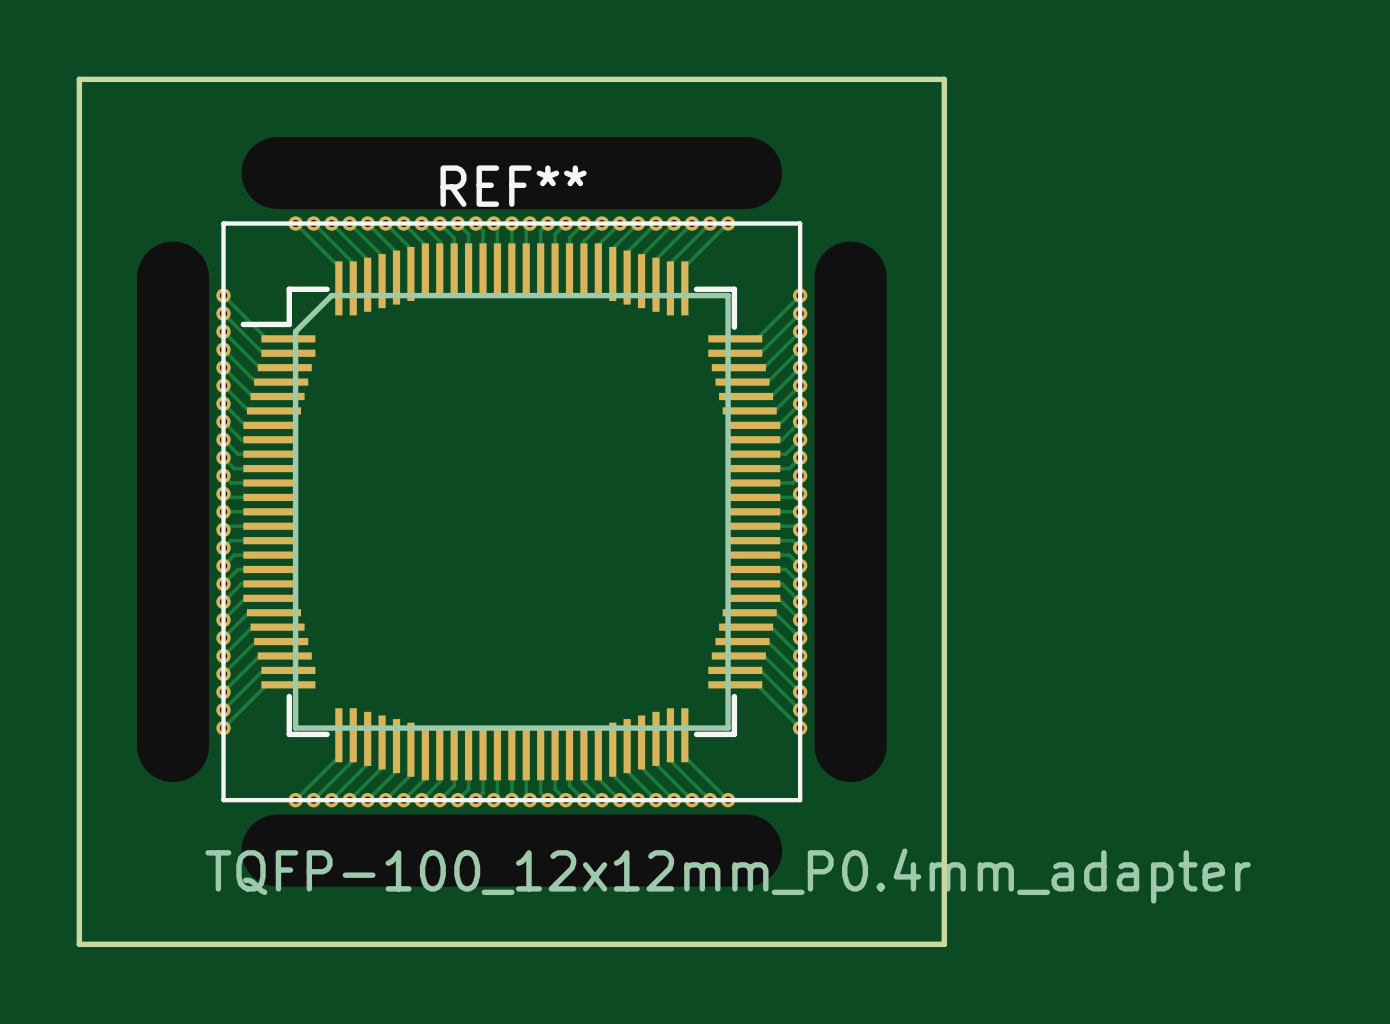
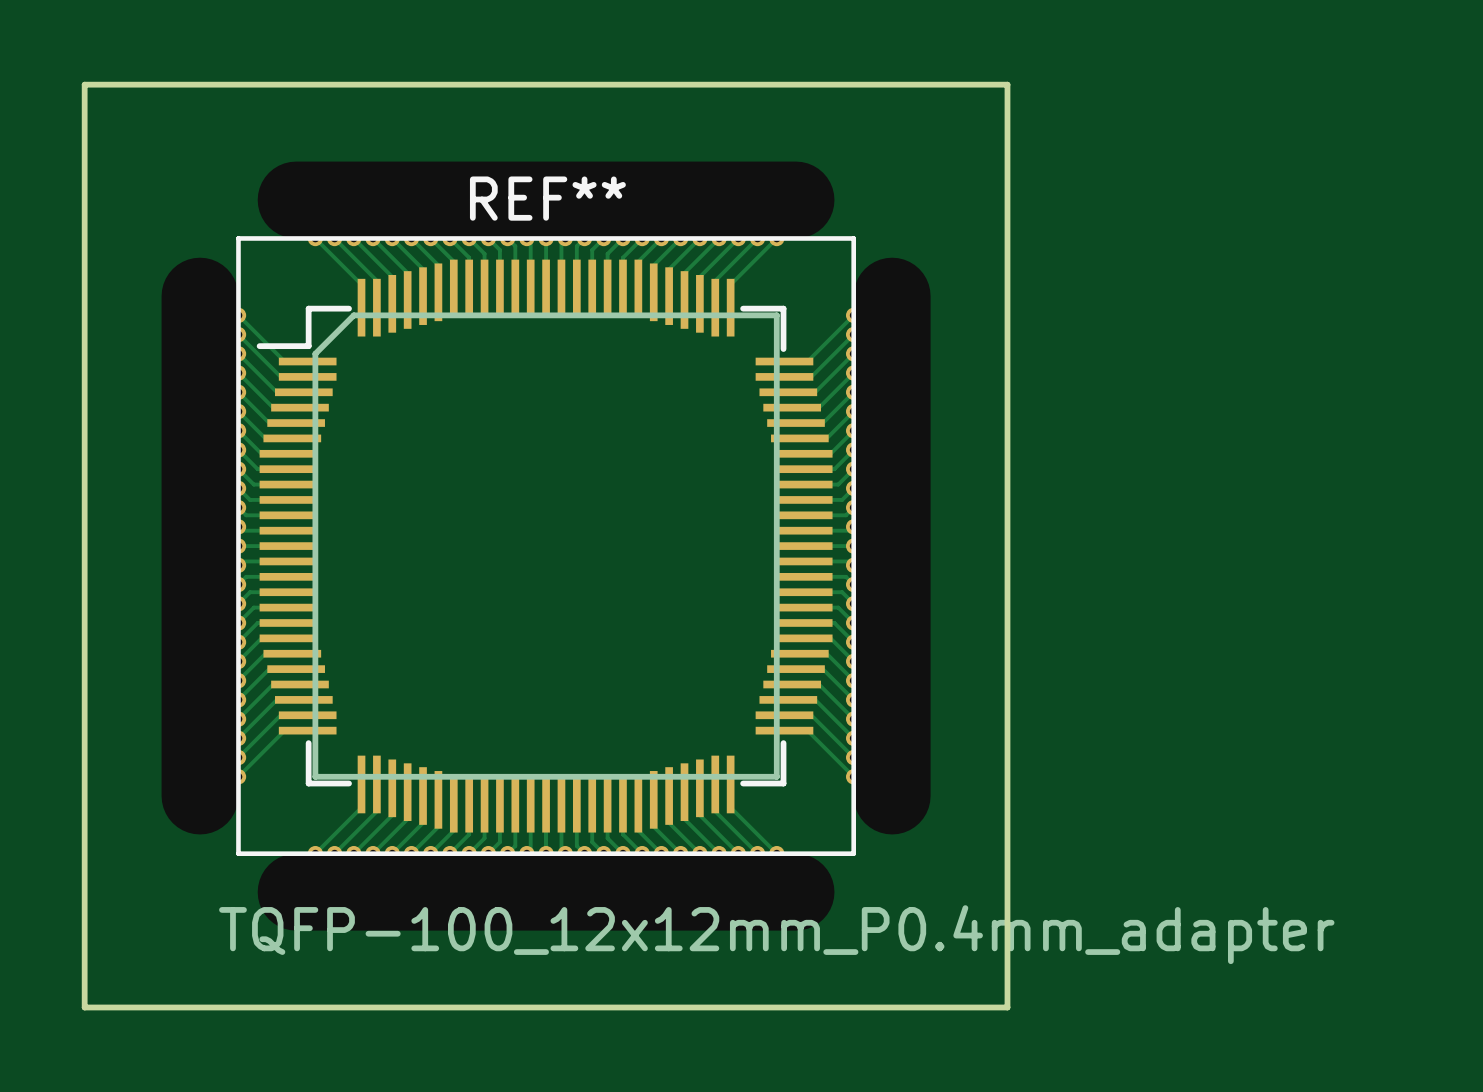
REF** footprint: [137, 137, 887, 887] -> [161, 161, 931, 931]

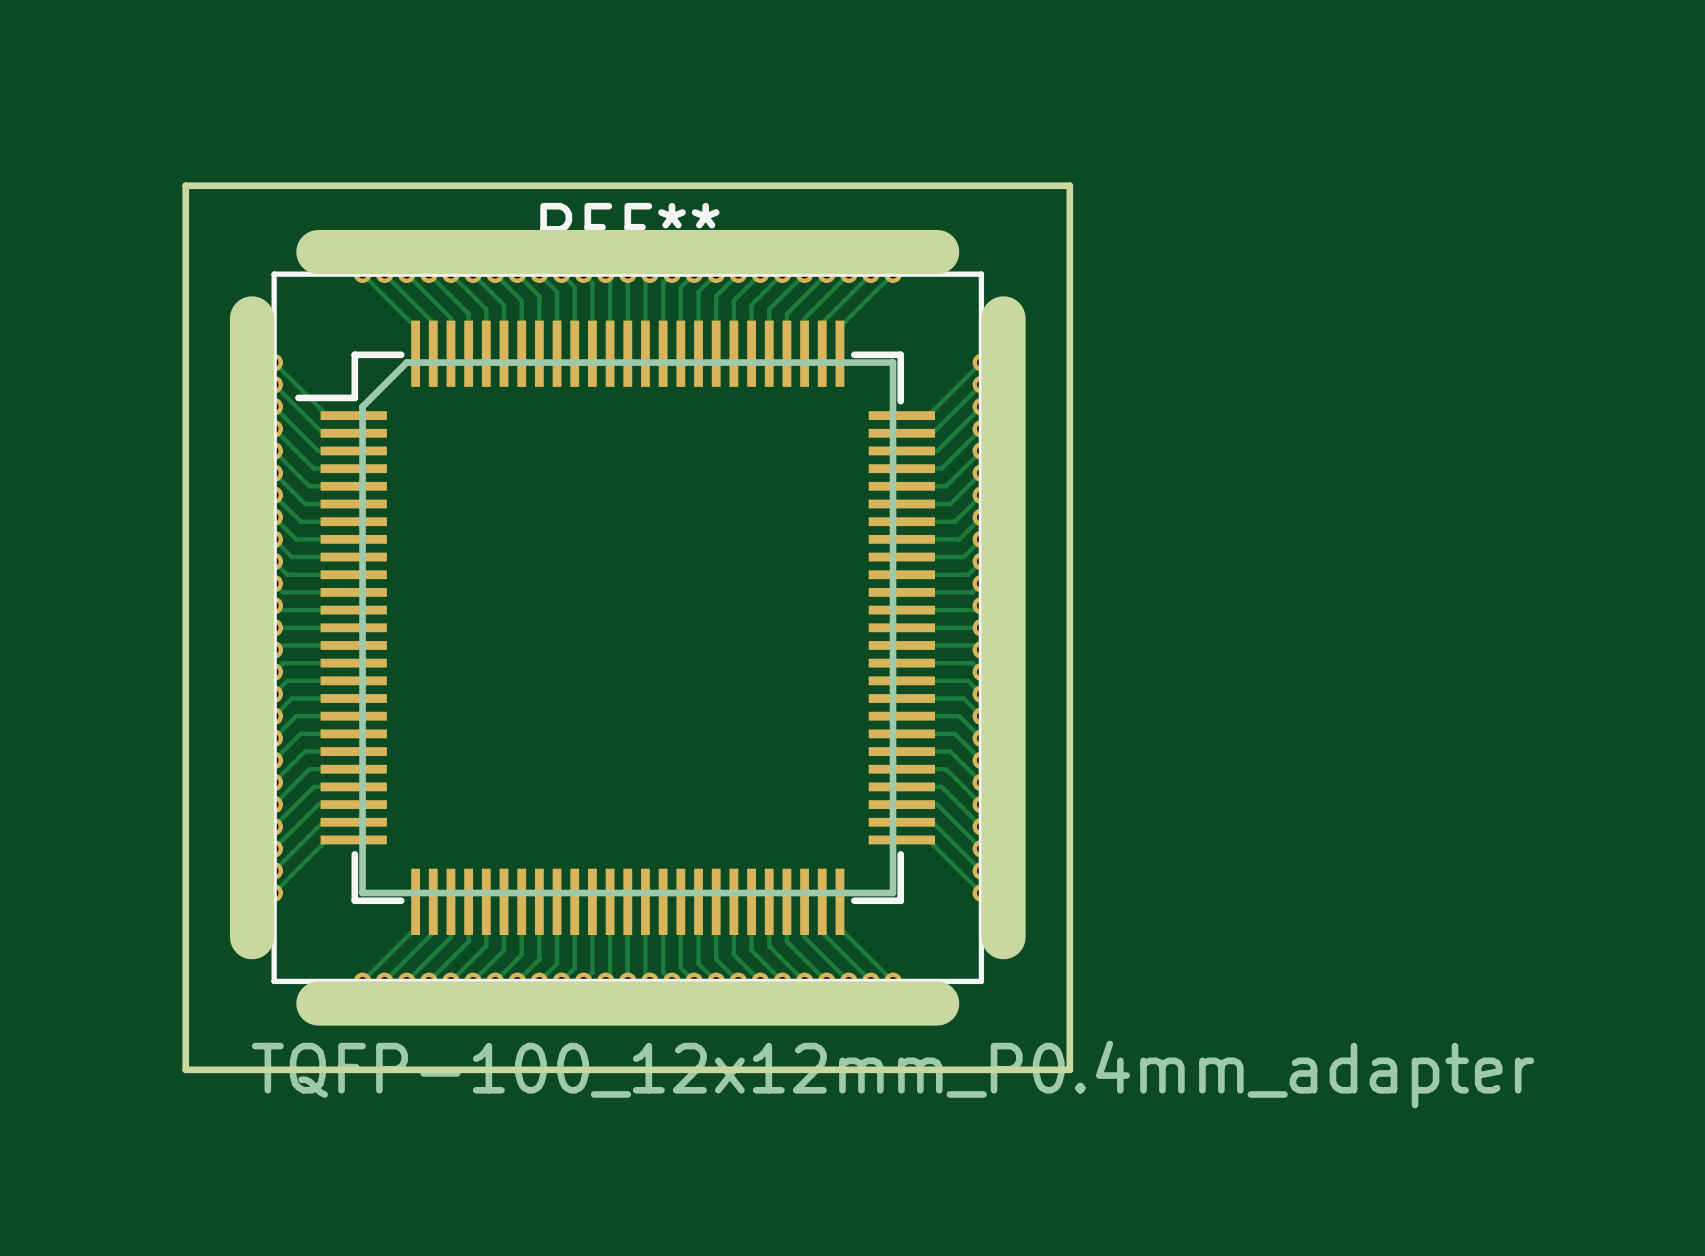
board edge: (84, 84) (84, 1007) (1007, 1007) (1007, 84) (84, 84) -> (185, 185) (185, 1069) (1069, 1069) (1069, 185) (185, 185)
REF** footprint: [161, 161, 931, 931] -> [265, 265, 991, 991]
board edge: none -> (318, 252) (937, 252)
board edge: none -> (252, 318) (252, 937)
board edge: none -> (1003, 318) (1003, 937)
board edge: none -> (318, 1003) (937, 1003)

